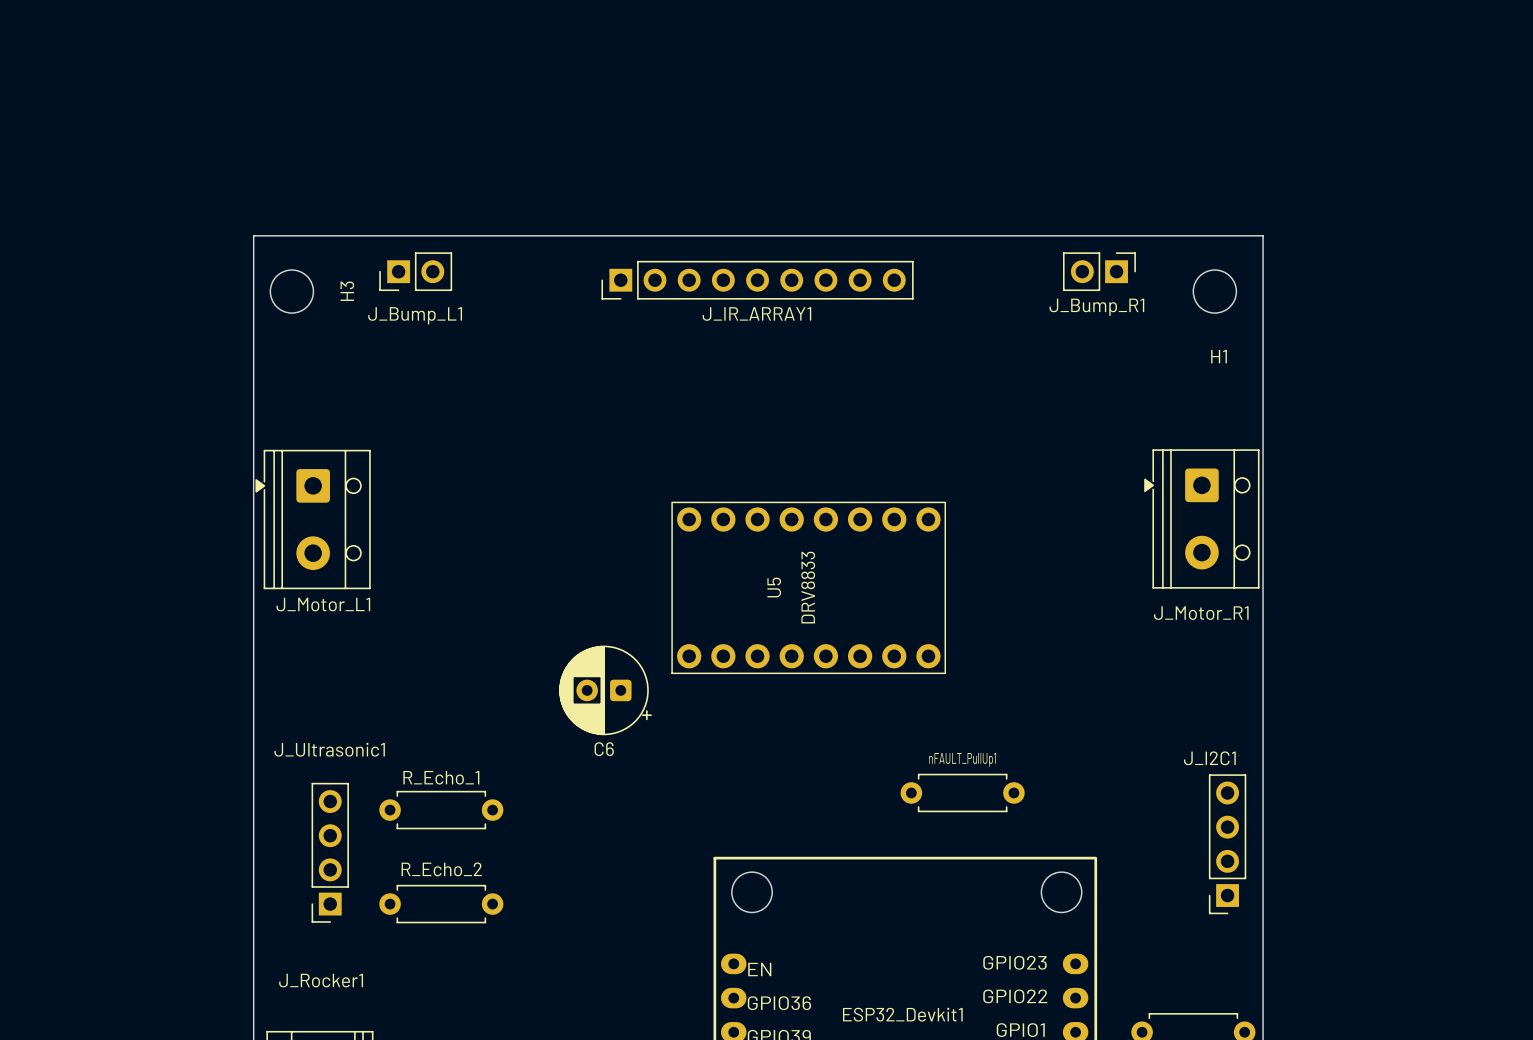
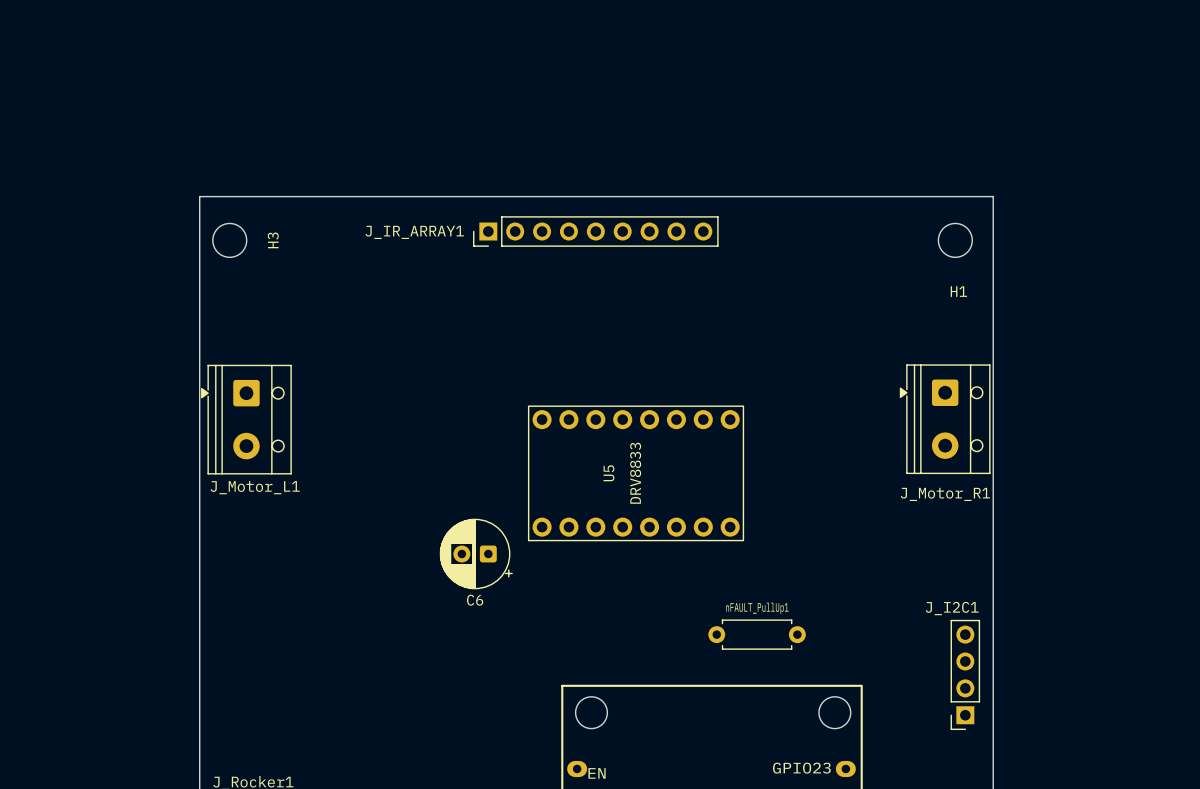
J_Bump_L1: (415, 271) -> none
J_Bump_R1: (1099, 271) -> none
J_IR_ARRAY1 name position: J_IR_ARRAY1 (756, 313) -> J_IR_ARRAY1 (414, 232)
R_Echo_1: (441, 810) -> none
J_Ultrasonic1: (330, 852) -> none
R_Echo_2: (441, 904) -> none

